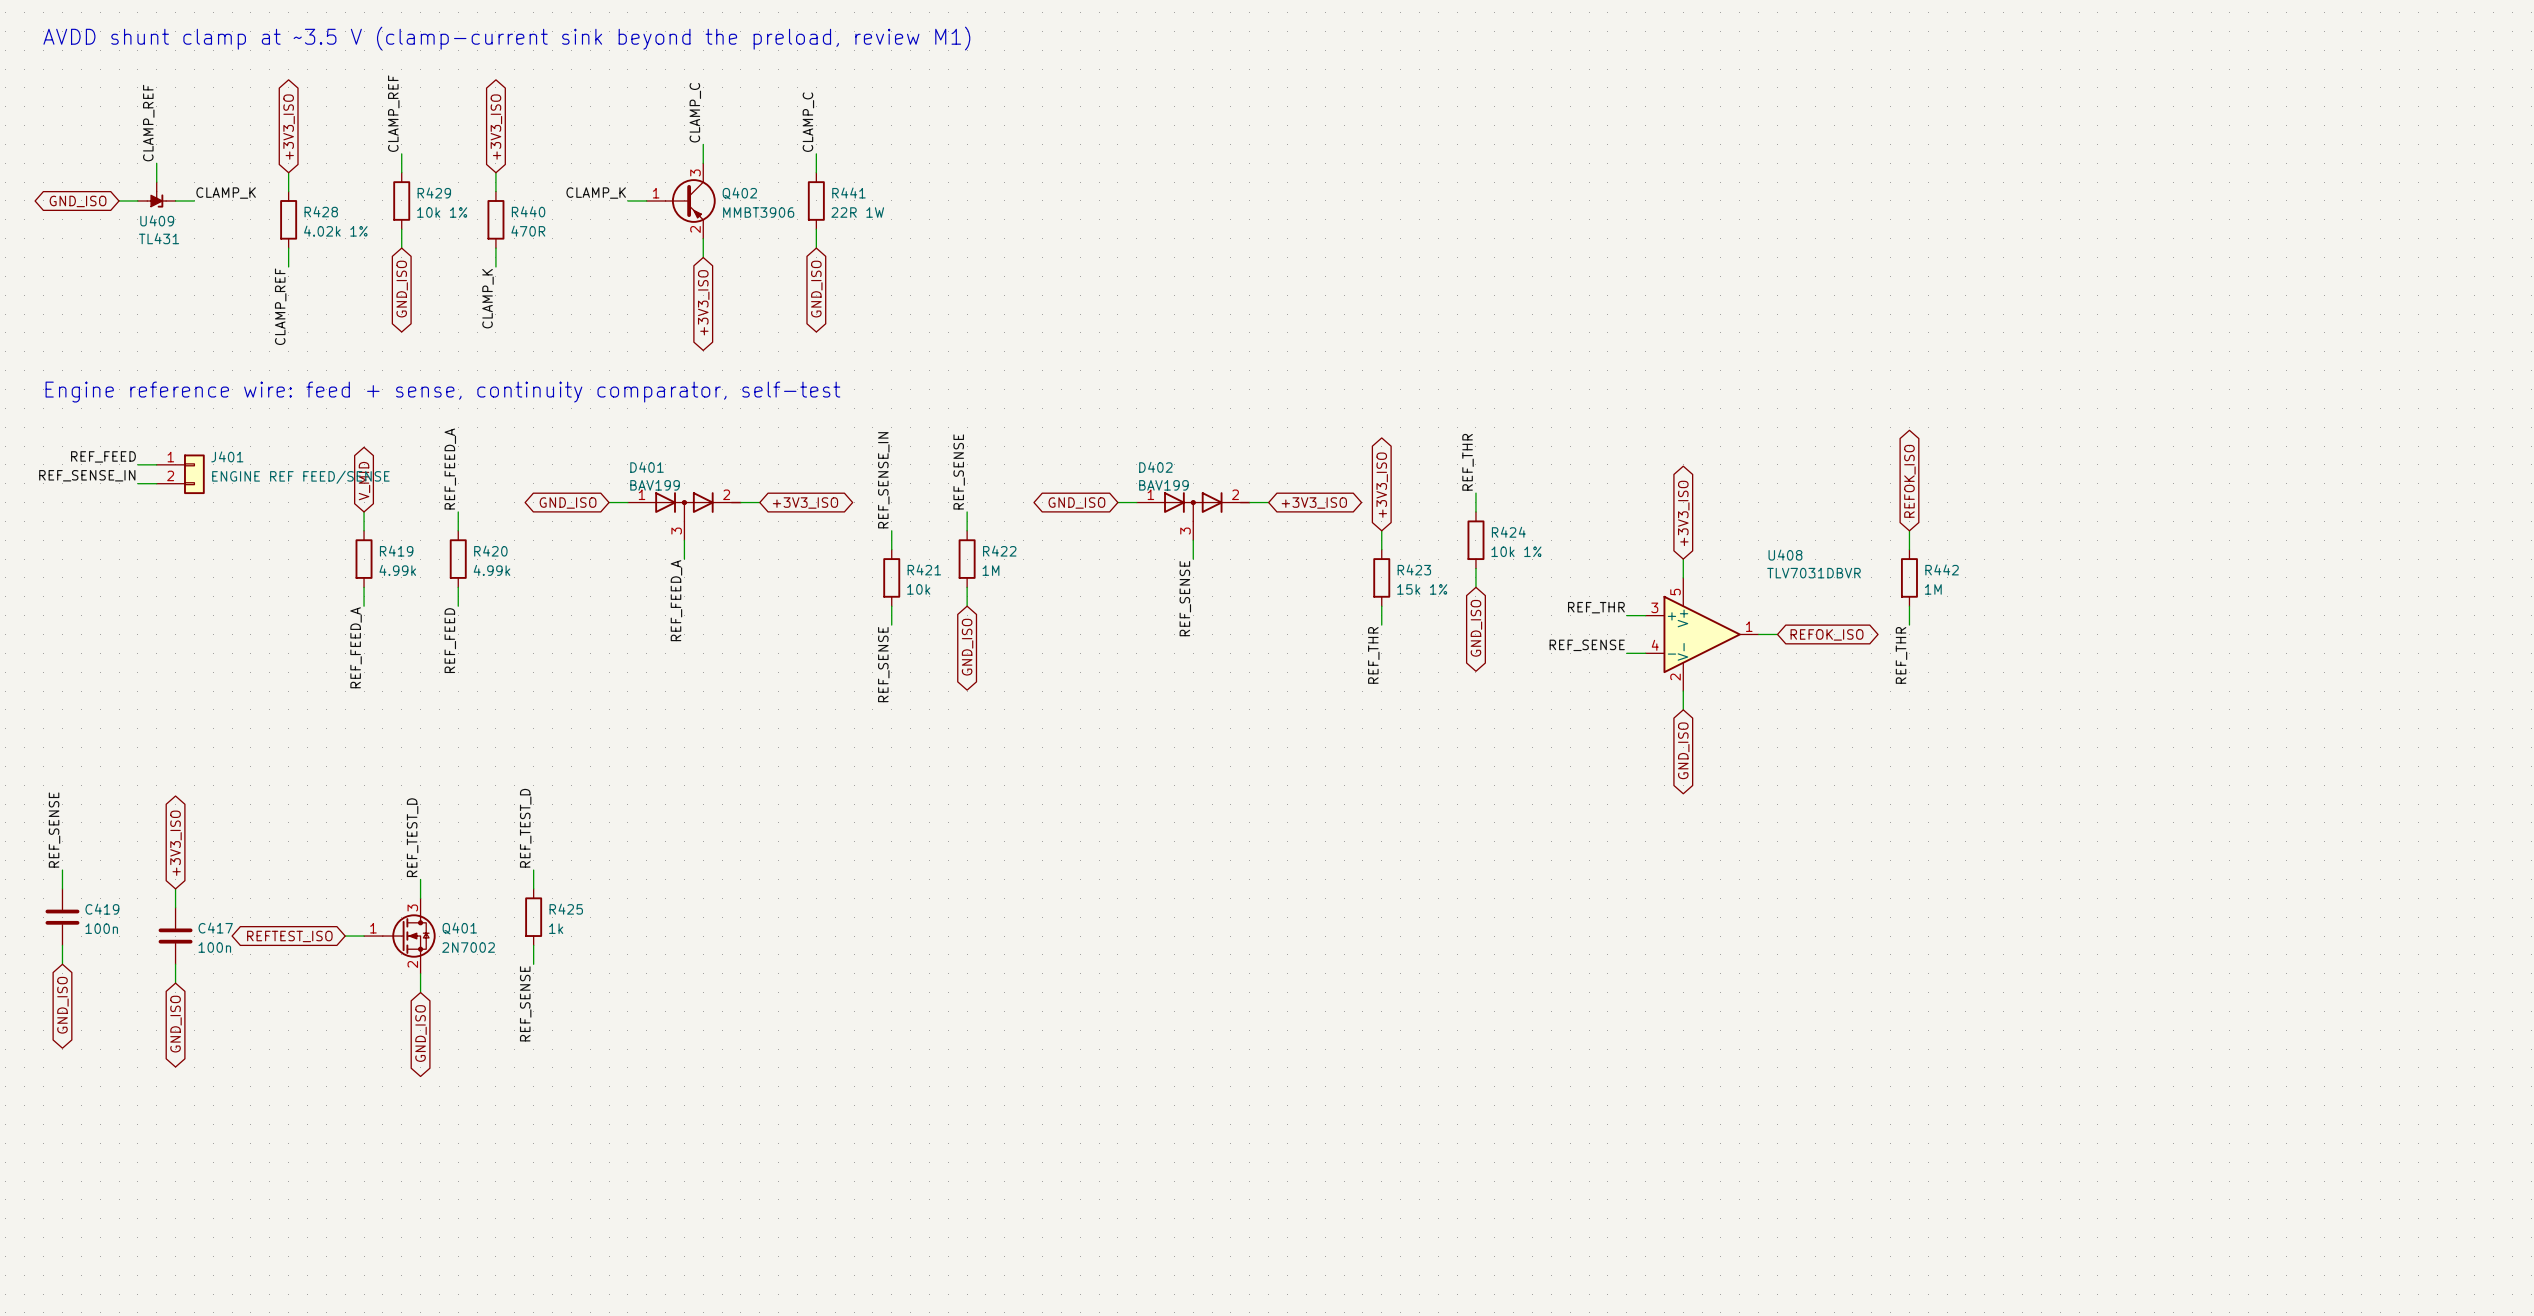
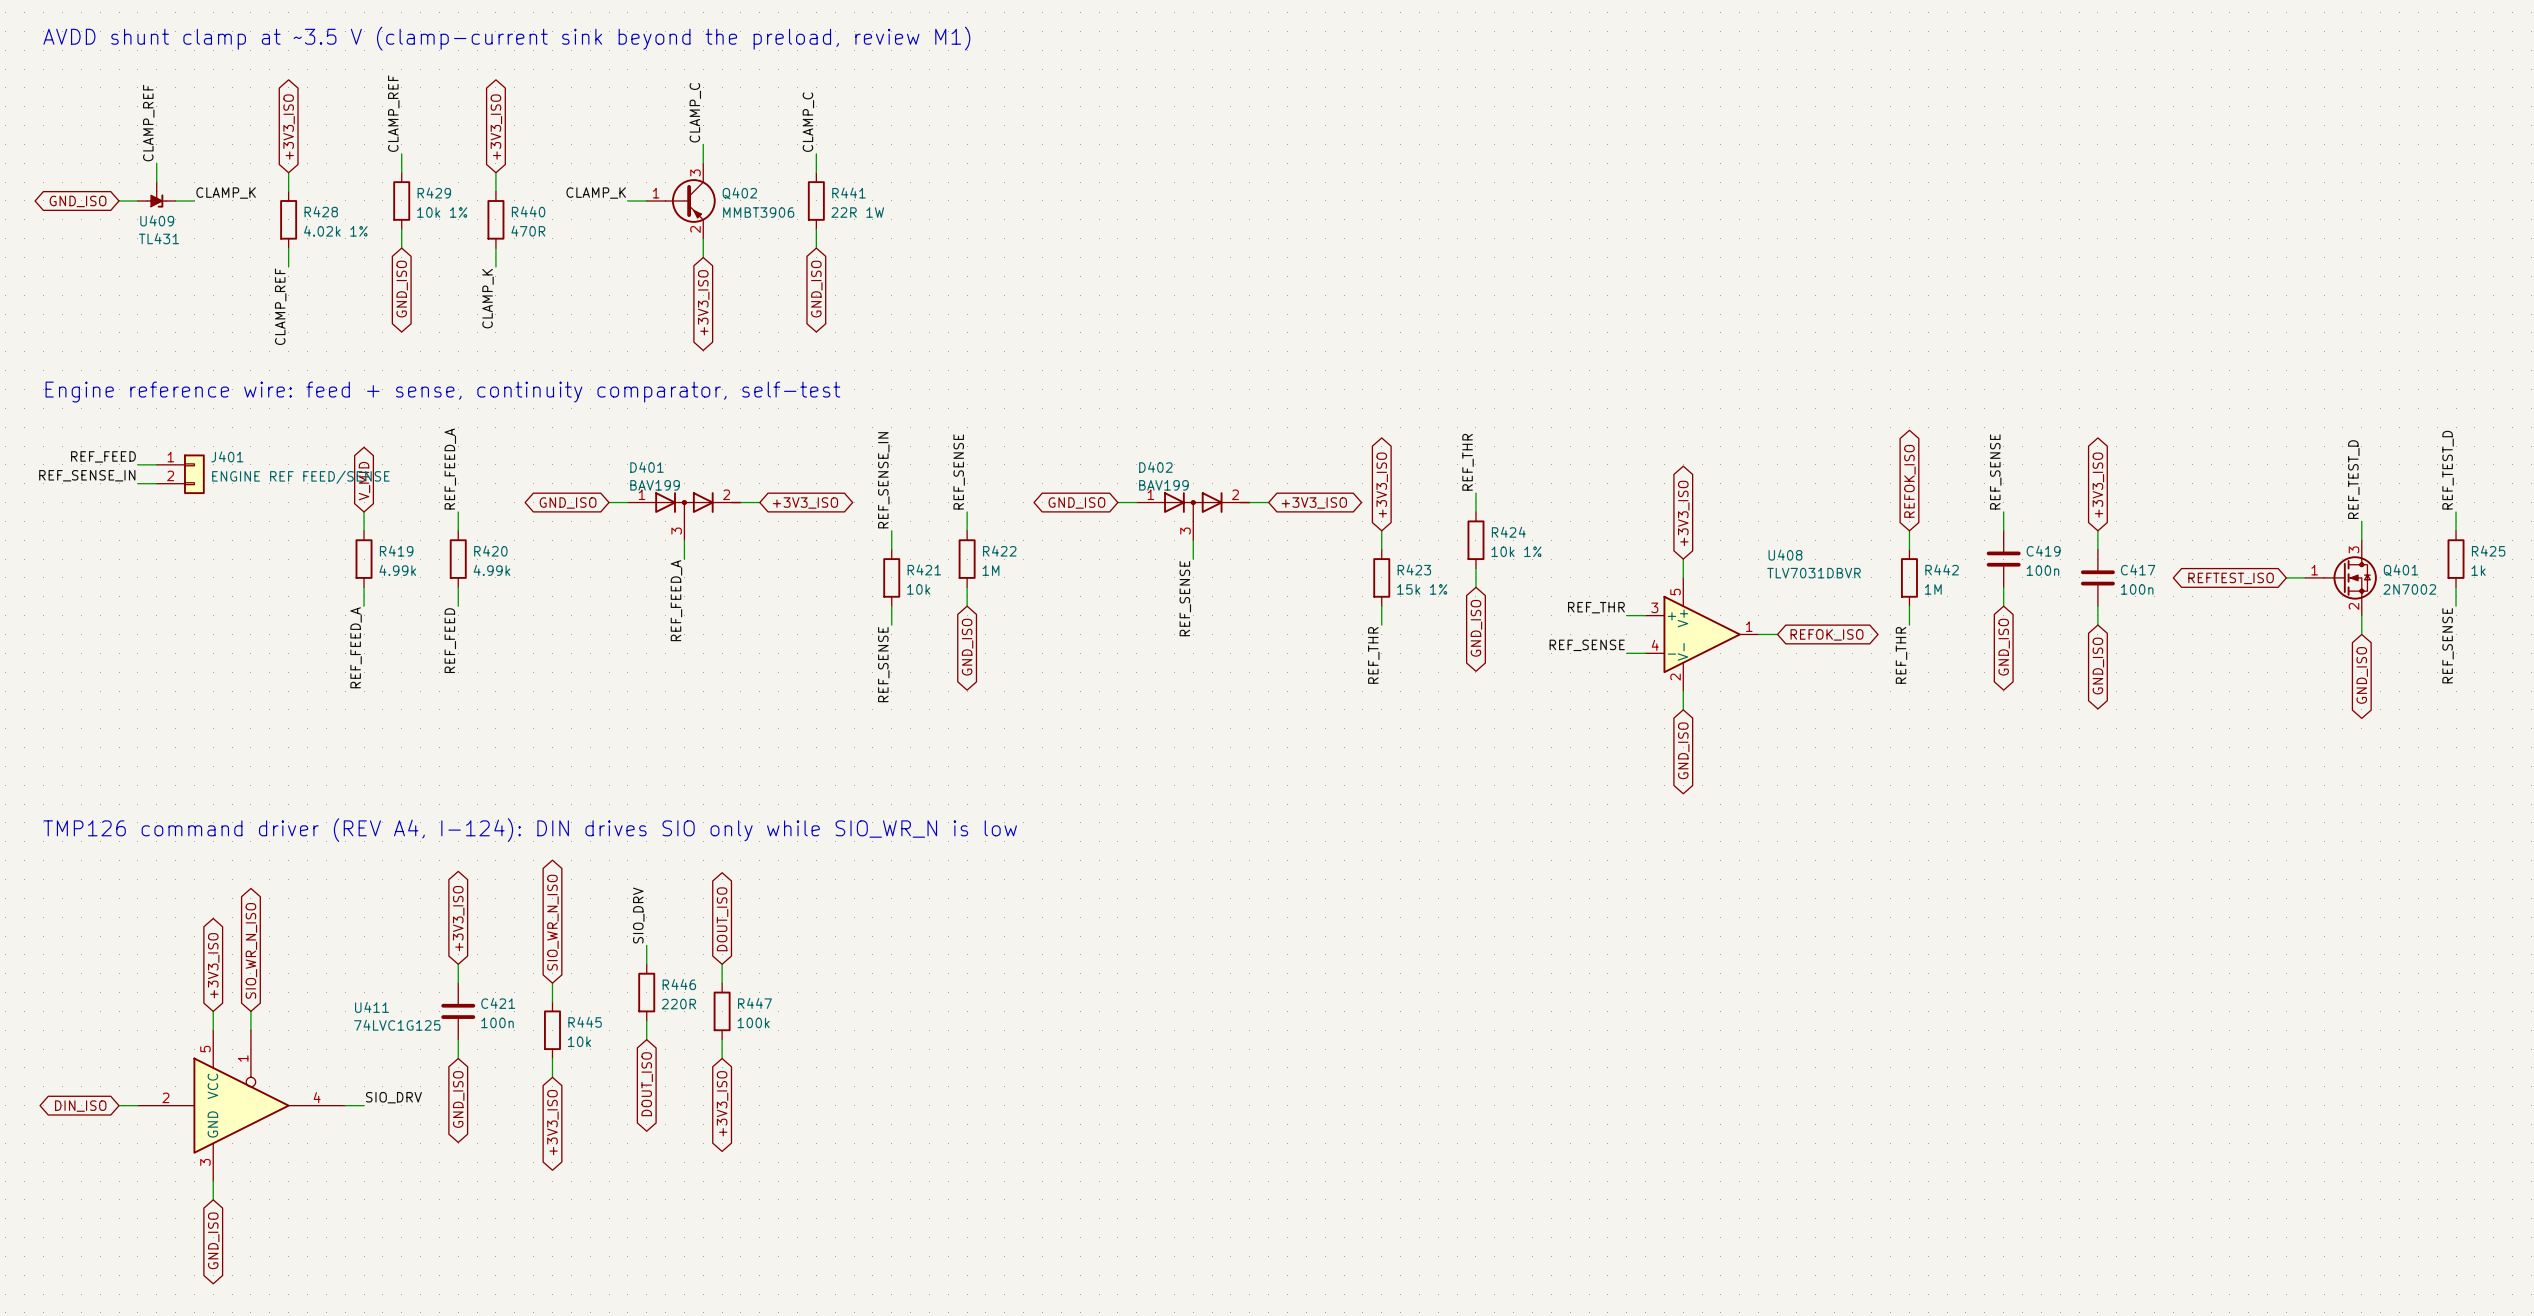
label: none -> REF_TEST_D (2448, 470)
label: none -> REF_SENSE (1995, 471)
label: none -> REF_TEST_D (2353, 479)
global label: none -> +3V3_ISO (2098, 485)
wire: none -> (2003, 511) (2003, 530)
wire: none -> (2456, 511) (2456, 530)
wire: none -> (2361, 521) (2361, 540)
wire: none -> (2097, 530) (2097, 549)
wire: none -> (2286, 577) (2305, 577)
global label: none -> REFTEST_ISO (2231, 578)
wire: none -> (2003, 587) (2003, 606)
wire: none -> (2456, 587) (2456, 606)
wire: none -> (2097, 606) (2097, 625)
wire: none -> (2361, 615) (2361, 634)
label: none -> REF_SENSE (2448, 645)
global label: none -> GND_ISO (2004, 647)
global label: none -> GND_ISO (2098, 666)
global label: none -> GND_ISO (2362, 675)
label: REF_TEST_D (525, 828) -> none
label: REF_SENSE (54, 830) -> none
text: none -> TMP126 command driver (REV A4, I-124): DIN drives SIO only while SIO_WR_N is low (530, 830)
label: REF_TEST_D (412, 837) -> none
global label position: +3V3_ISO (176, 843) -> +3V3_ISO (213, 965)
wire: (62, 870) (62, 888) -> none
wire: (533, 870) (533, 888) -> (552, 983) (552, 1001)
wire: (420, 879) (420, 898) -> (458, 1039) (458, 1058)
wire: (175, 888) (175, 907) -> (250, 1011) (250, 1030)
label: none -> SIO_DRV (638, 915)
C419 position: (62, 917) -> (2003, 559)
R425 position: (533, 917) -> (2456, 559)
global label: none -> +3V3_ISO (458, 918)
global label: none -> DOUT_ISO (722, 919)
global label: none -> SIO_WR_N_ISO (552, 922)
C417 position: (175, 936) -> (2097, 577)
global label: REFTEST_ISO (289, 936) -> none
wire: (345, 936) (364, 936) -> (345, 1105) (364, 1105)
Q401 position: (399, 936) -> (2341, 577)
wire: (62, 945) (62, 964) -> none
wire: (533, 945) (533, 964) -> (552, 1058) (552, 1077)
wire: none -> (646, 945) (646, 964)
global label: none -> SIO_WR_N_ISO (251, 950)
wire: (175, 964) (175, 983) -> (213, 1011) (213, 1030)
wire: none -> (722, 964) (722, 983)
wire: (420, 973) (420, 992) -> (458, 964) (458, 983)
R446: none -> 220R (646, 992)
label: REF_SENSE (525, 1003) -> none
global label: GND_ISO (62, 1005) -> none
C421: none -> 100n (458, 1011)
R447: none -> 100k (722, 1011)
wire: none -> (646, 1020) (646, 1039)
global label: GND_ISO (176, 1024) -> none
R445: none -> 10k (552, 1030)
global label position: GND_ISO (421, 1033) -> GND_ISO (458, 1099)
wire: none -> (722, 1039) (722, 1058)
global label: none -> DOUT_ISO (647, 1084)
label: none -> SIO_DRV (393, 1097)
global label: none -> +3V3_ISO (722, 1103)
wire: none -> (119, 1105) (137, 1105)
U411: none -> 74LVC1G125 (241, 1105)
global label: none -> DIN_ISO (80, 1106)
global label: none -> +3V3_ISO (552, 1122)
wire: none -> (213, 1181) (213, 1199)
global label: none -> GND_ISO (213, 1240)

